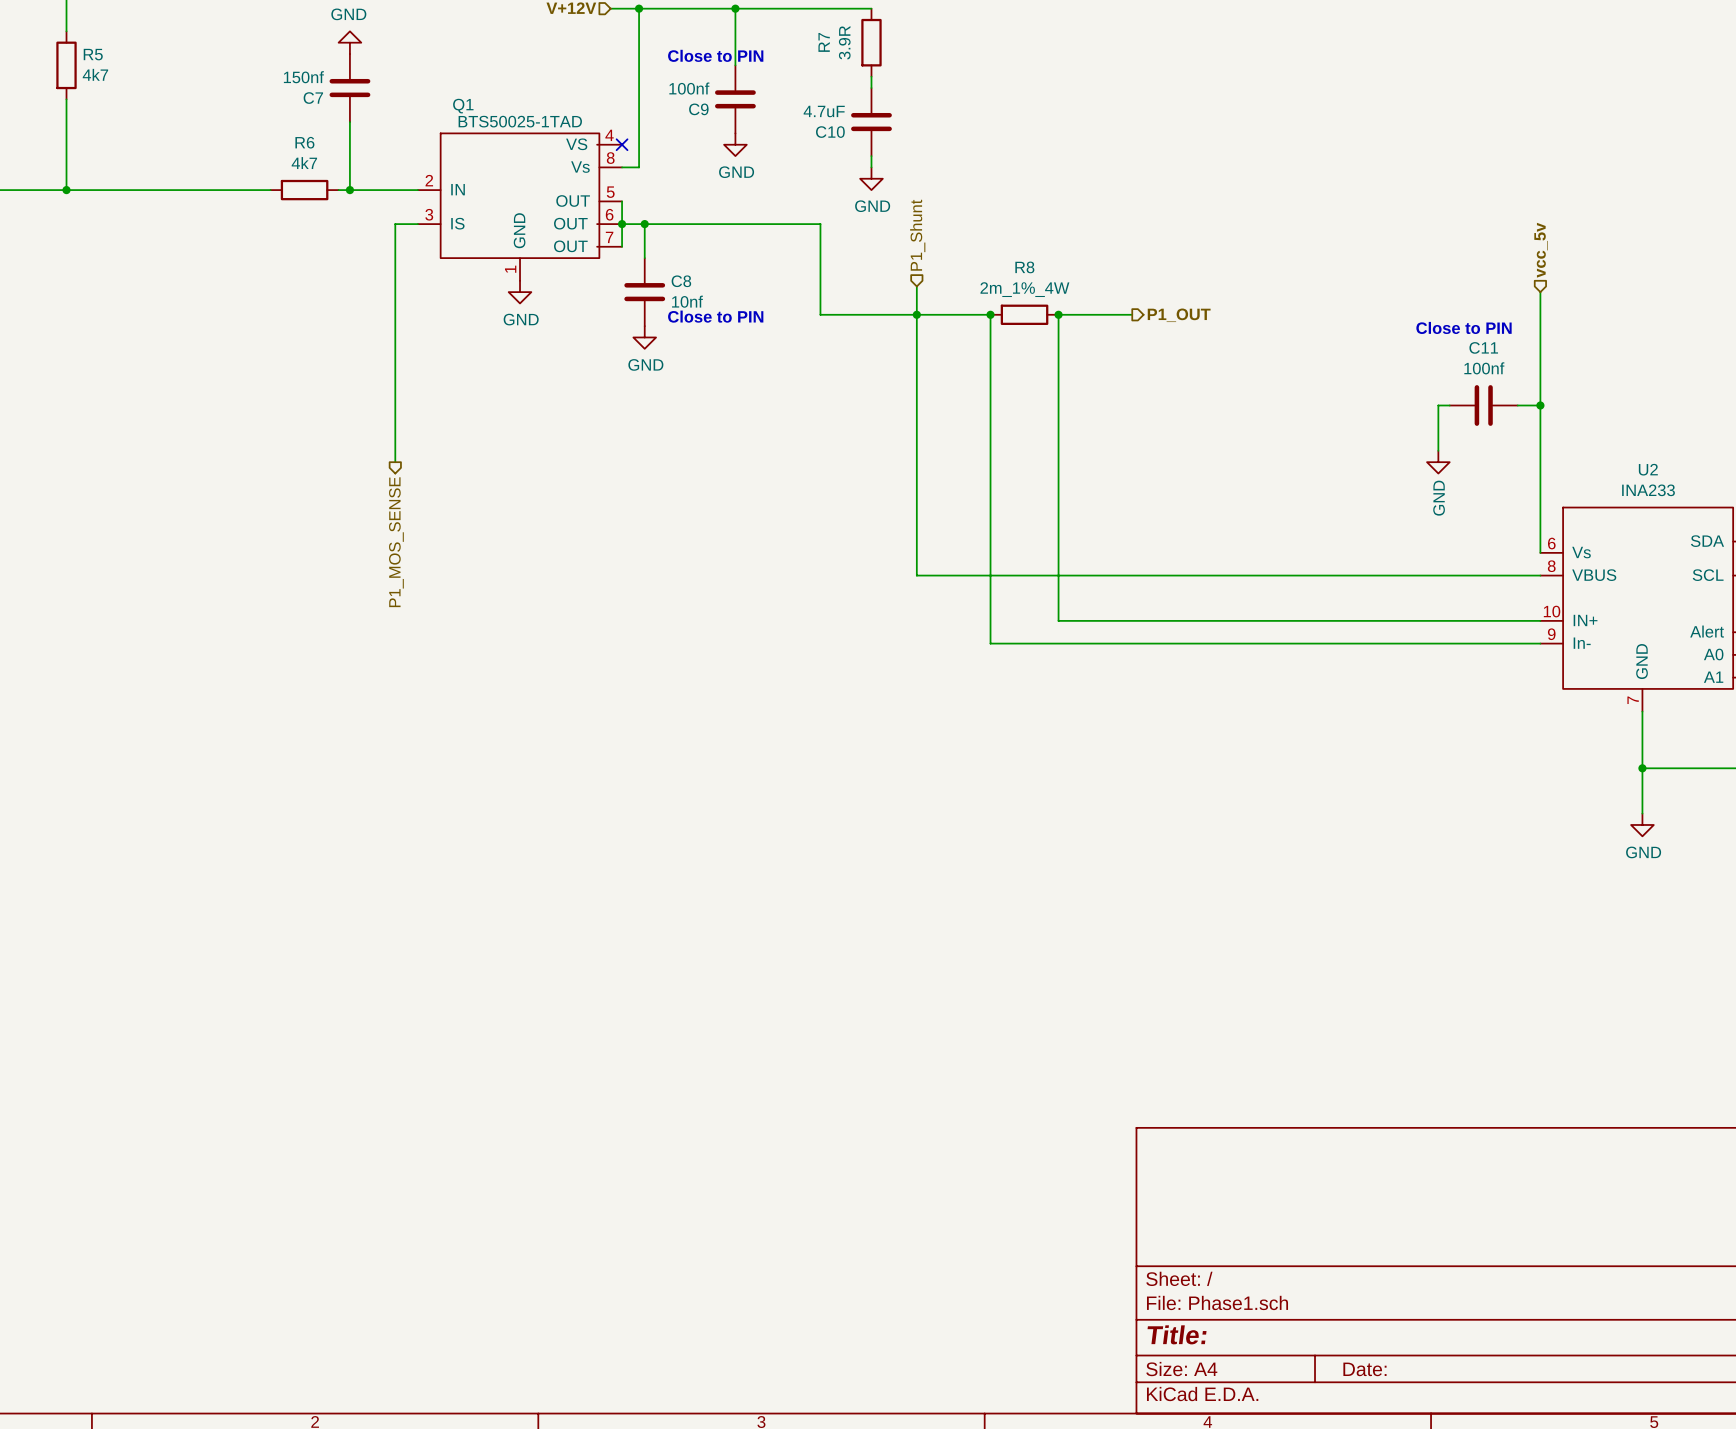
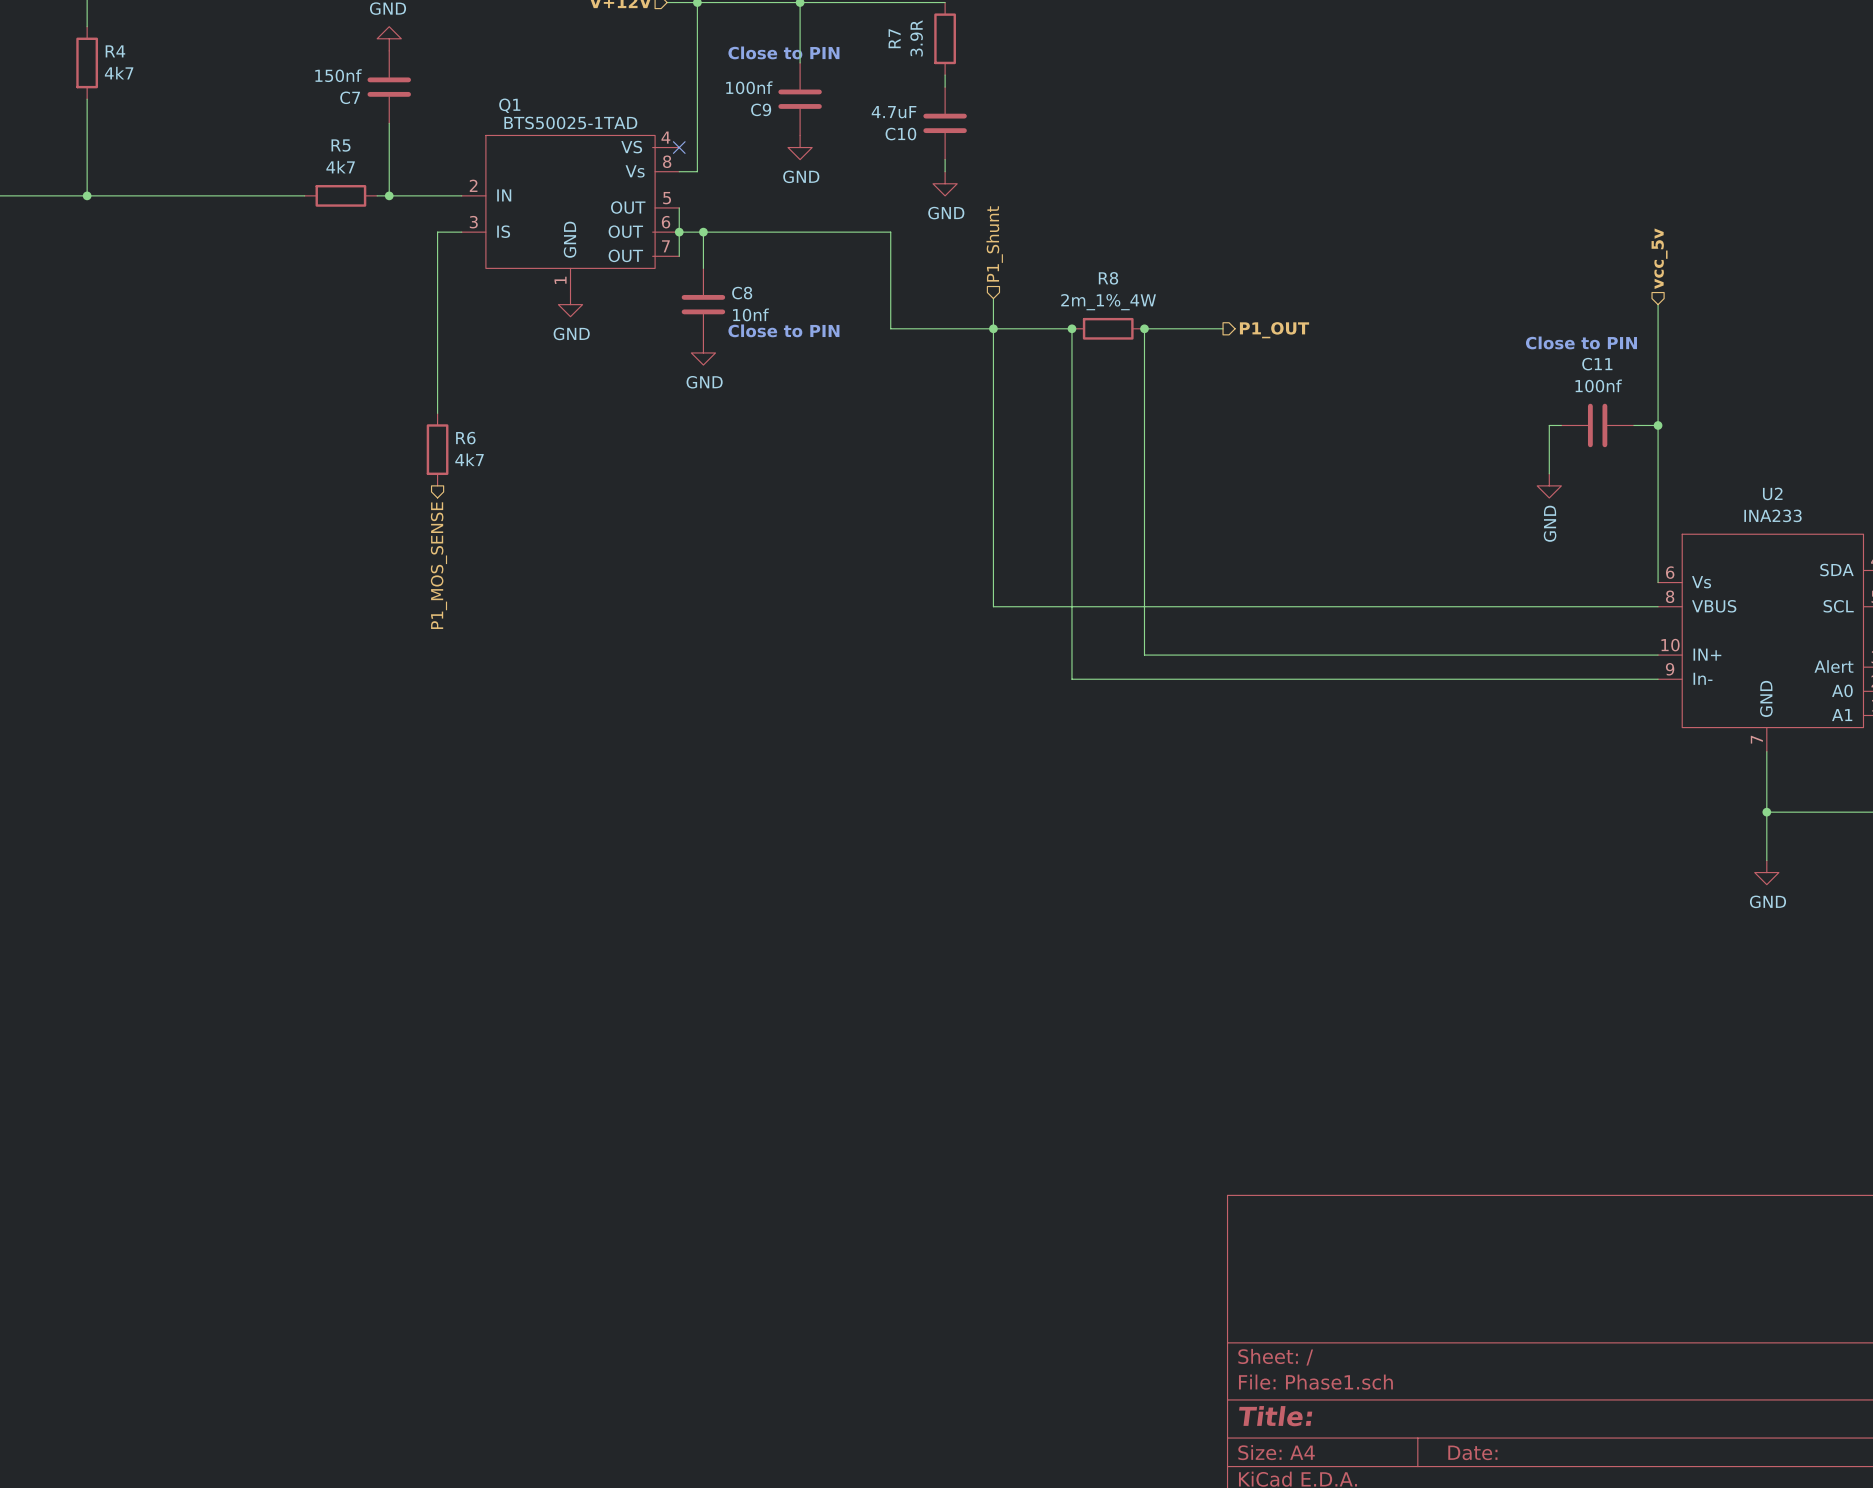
R5 name: R5 (93, 54) -> R4 (115, 51)
R6 name: R6 (304, 142) -> R5 (340, 145)
wire: (395, 394) (395, 462) -> none
R6: none -> 4k7 (437, 449)

